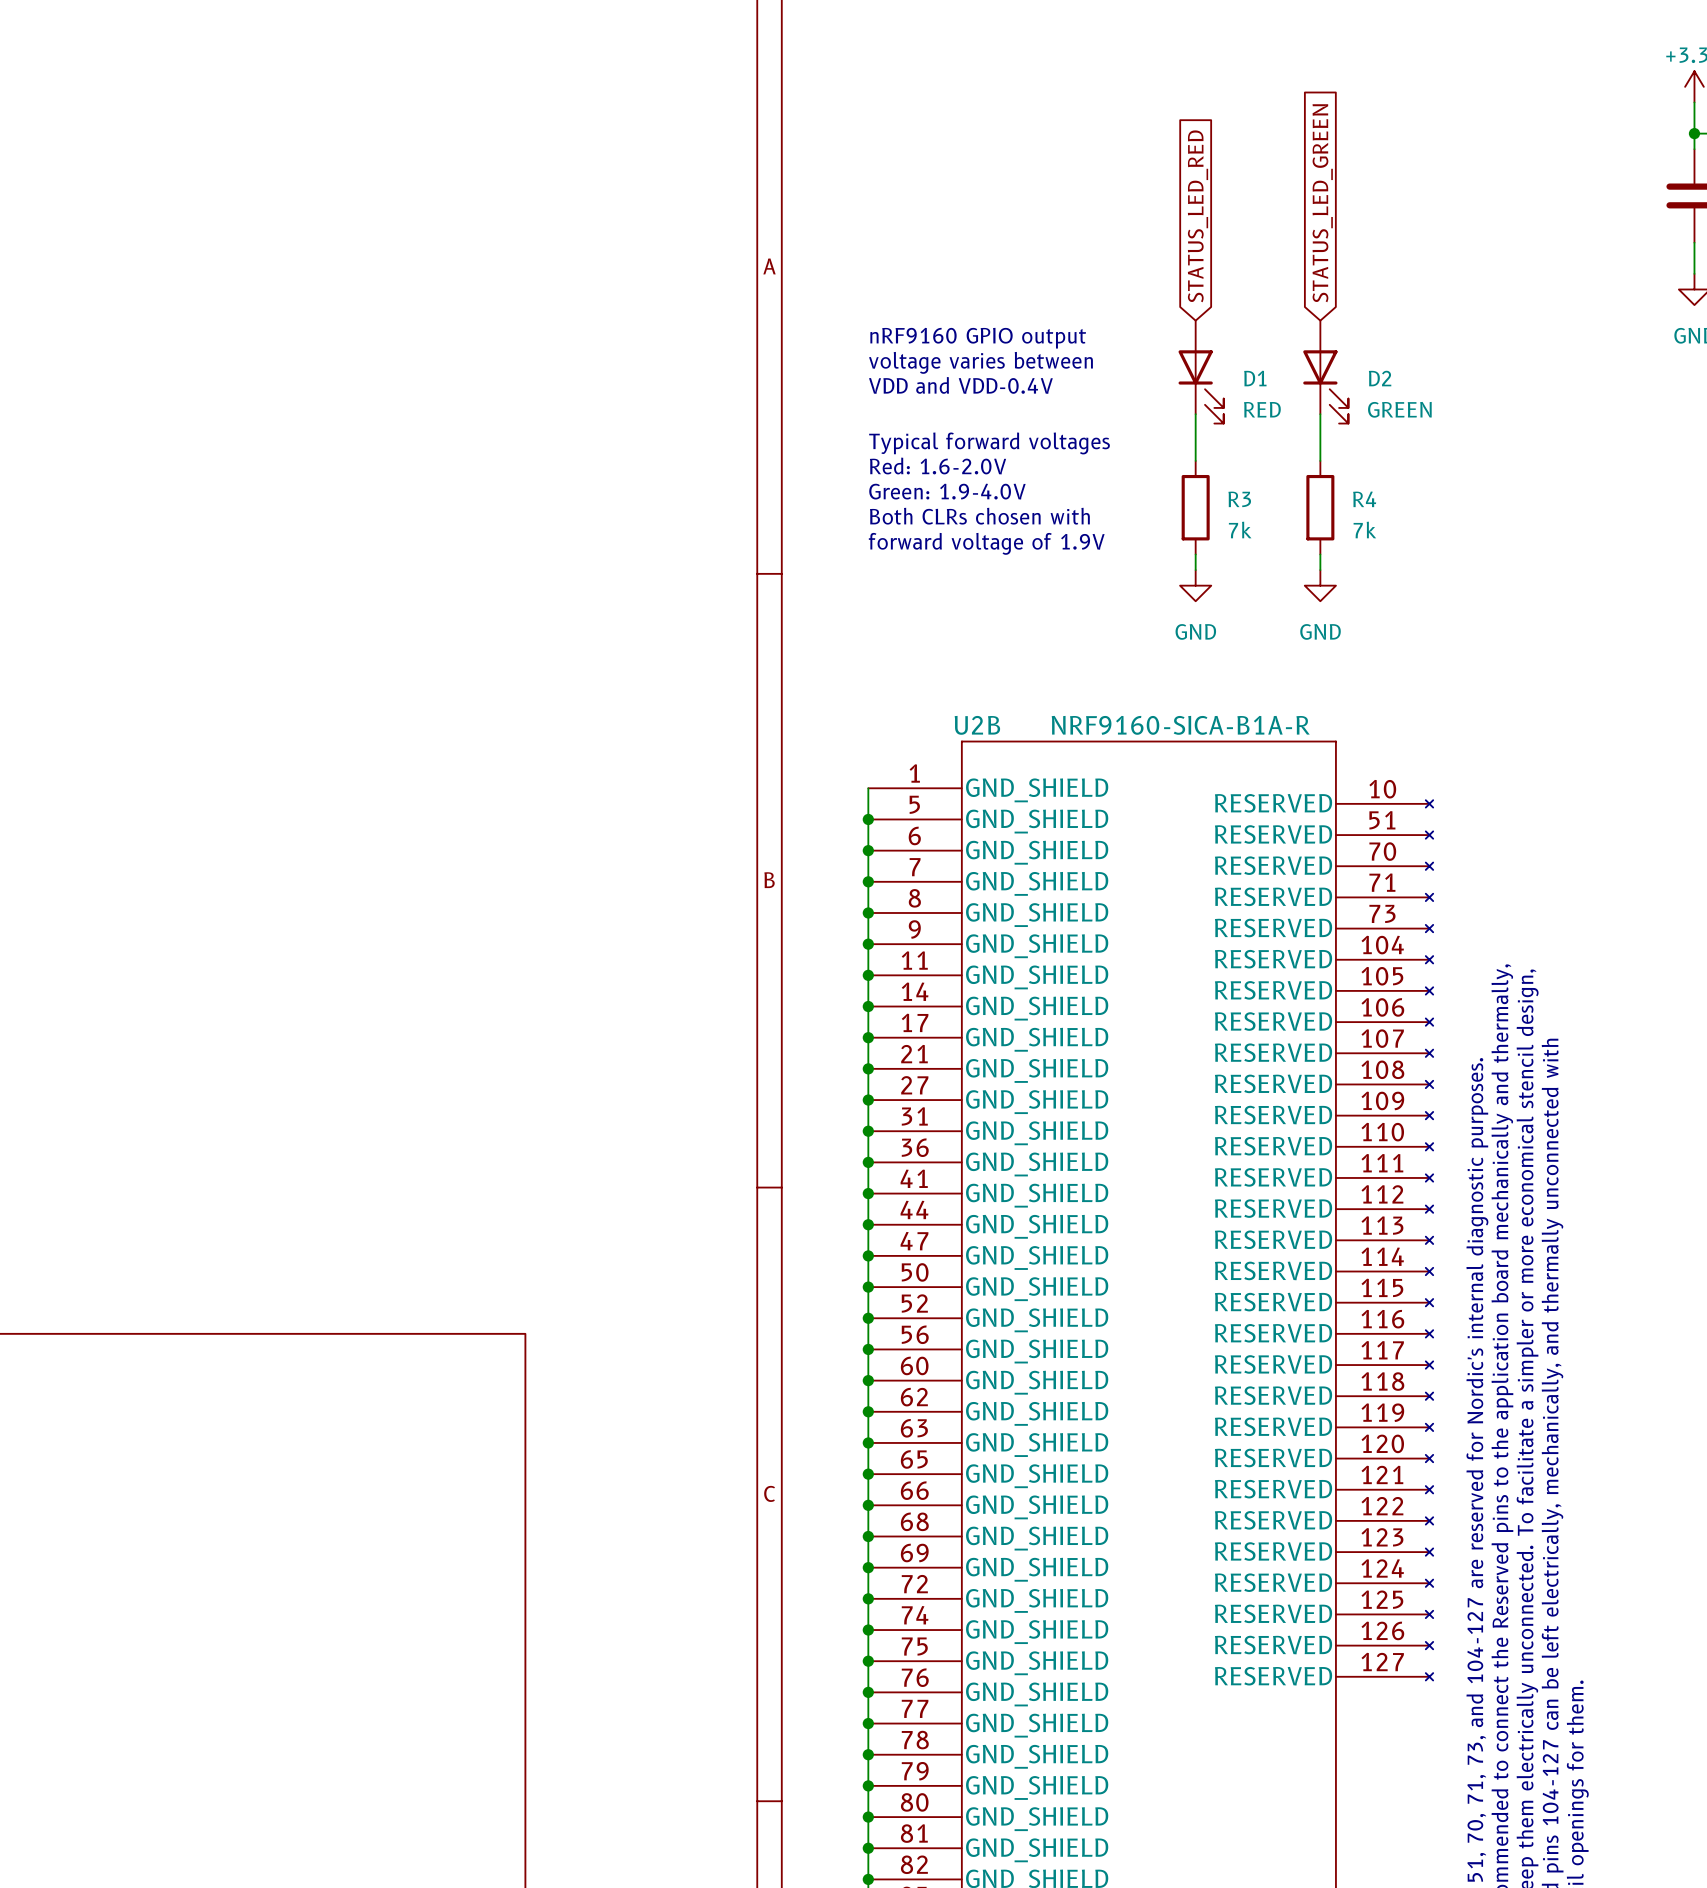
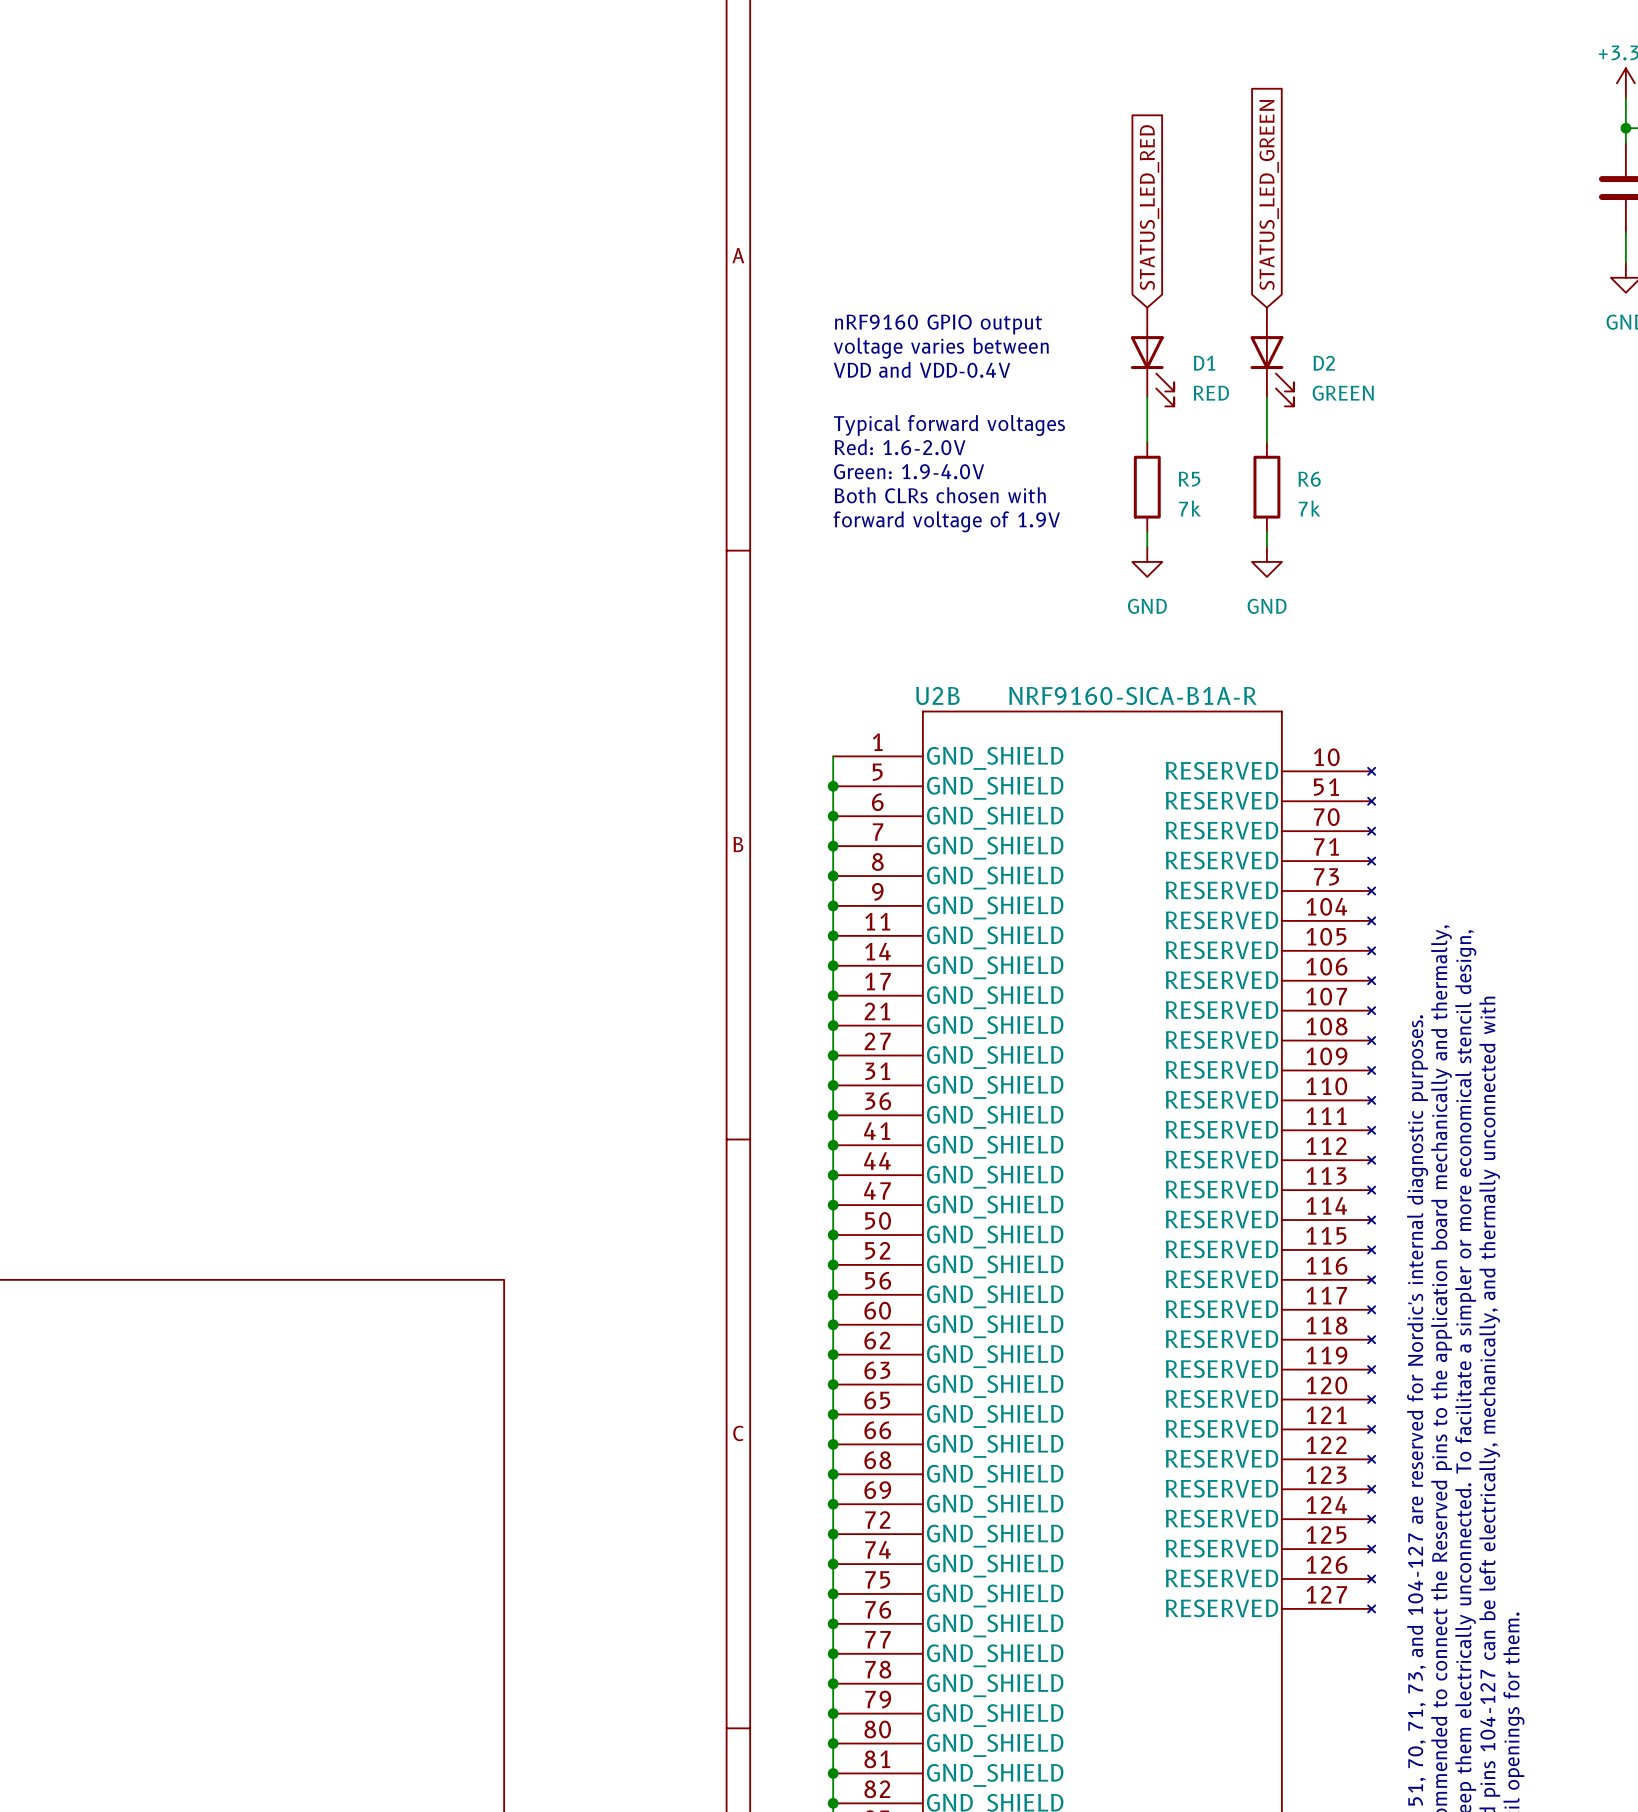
R3 name: R3 (1239, 499) -> R5 (1189, 479)
R4 name: R4 (1364, 499) -> R6 (1309, 479)

